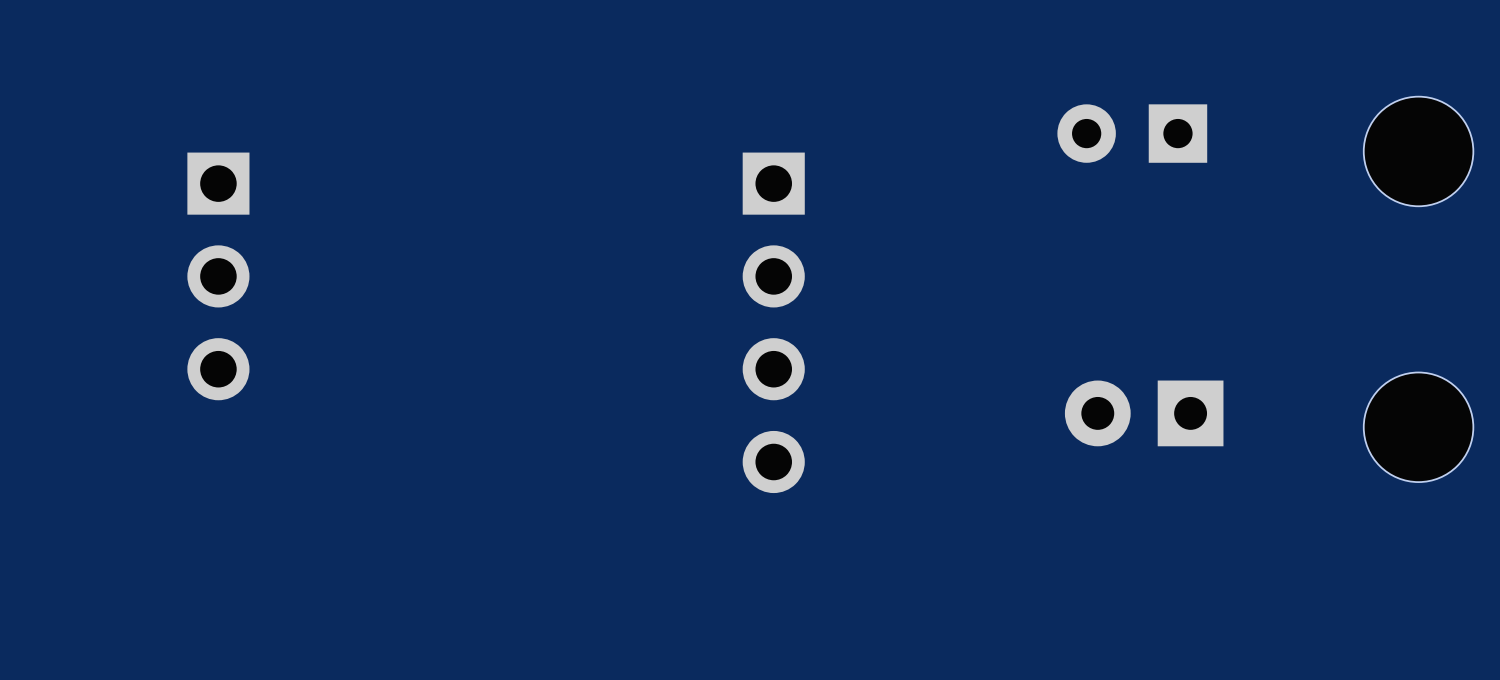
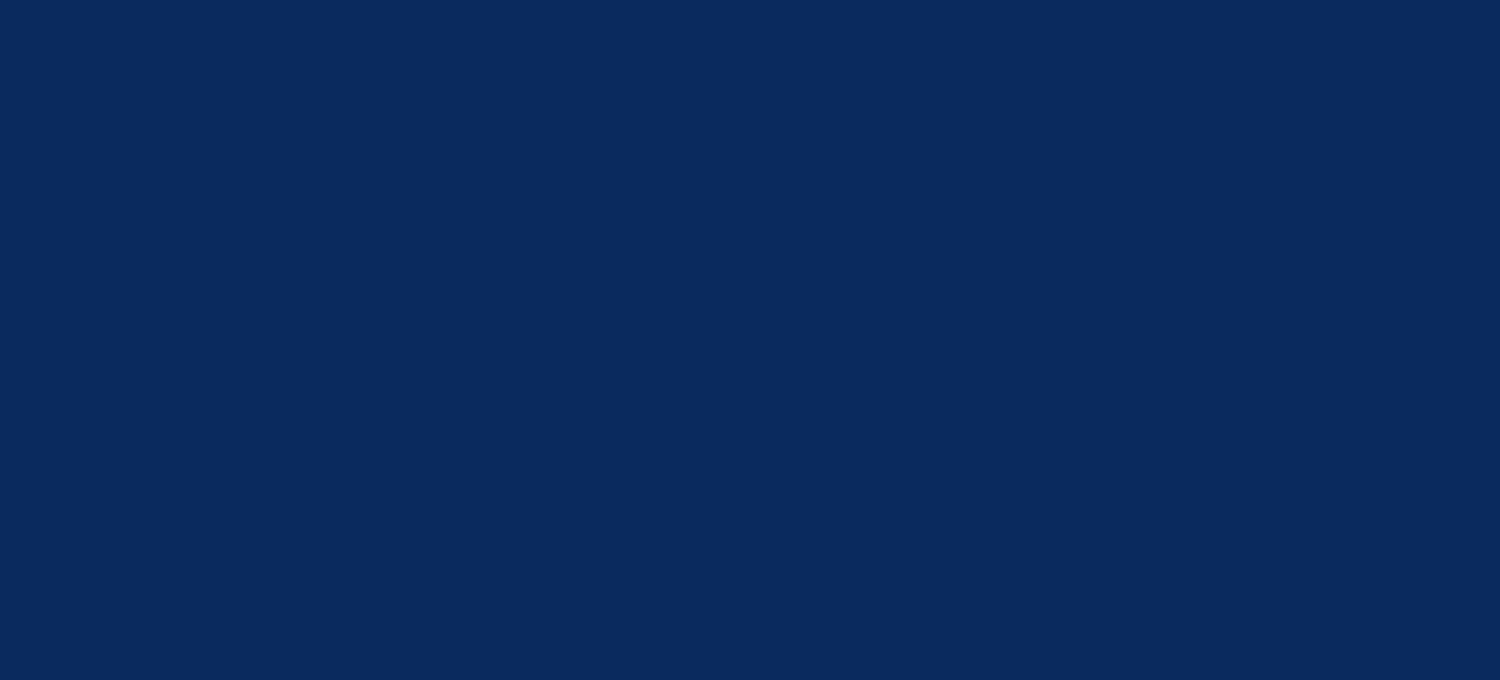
part: (1132, 133) -> none
part: (1418, 151) -> none
part: (218, 276) -> none
part: (773, 322) -> none
part: (1144, 413) -> none
part: (1418, 427) -> none

